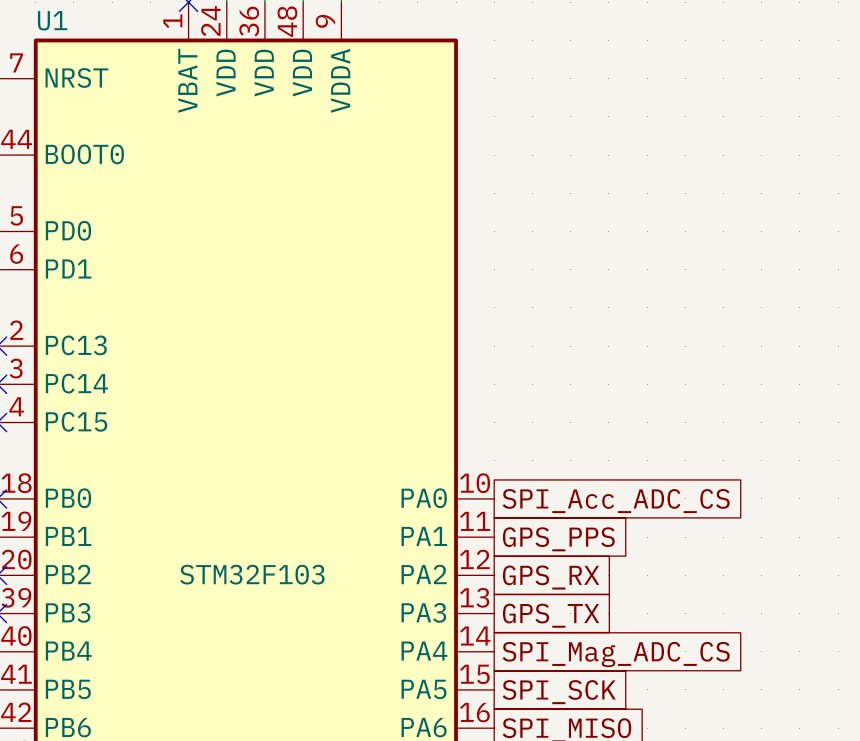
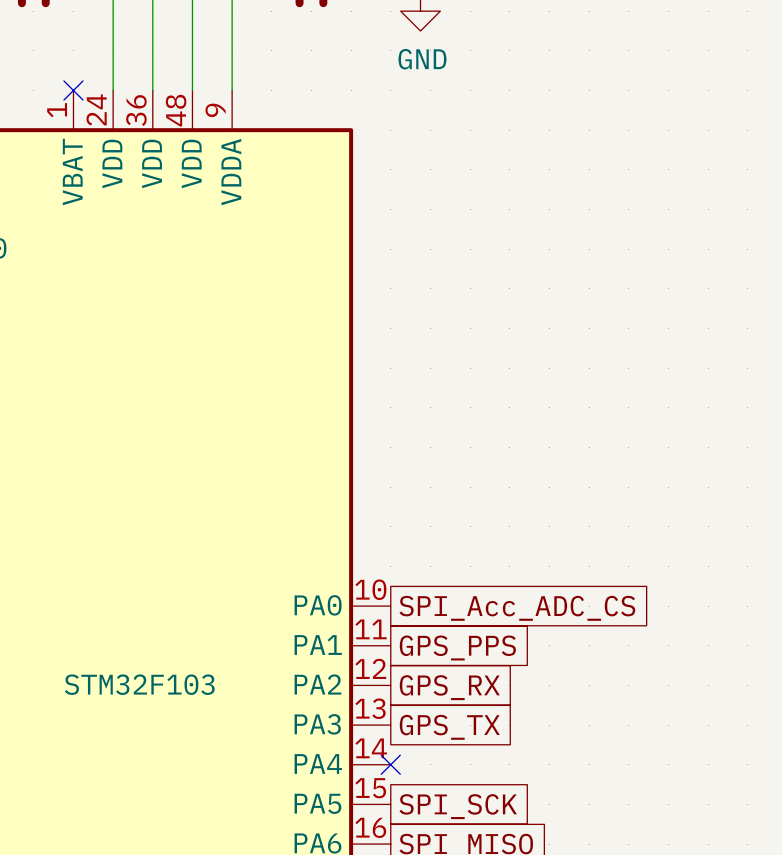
no-connect mark: none -> (390, 764)
global label: SPI_Mag_ADC_CS (616, 654) -> none

